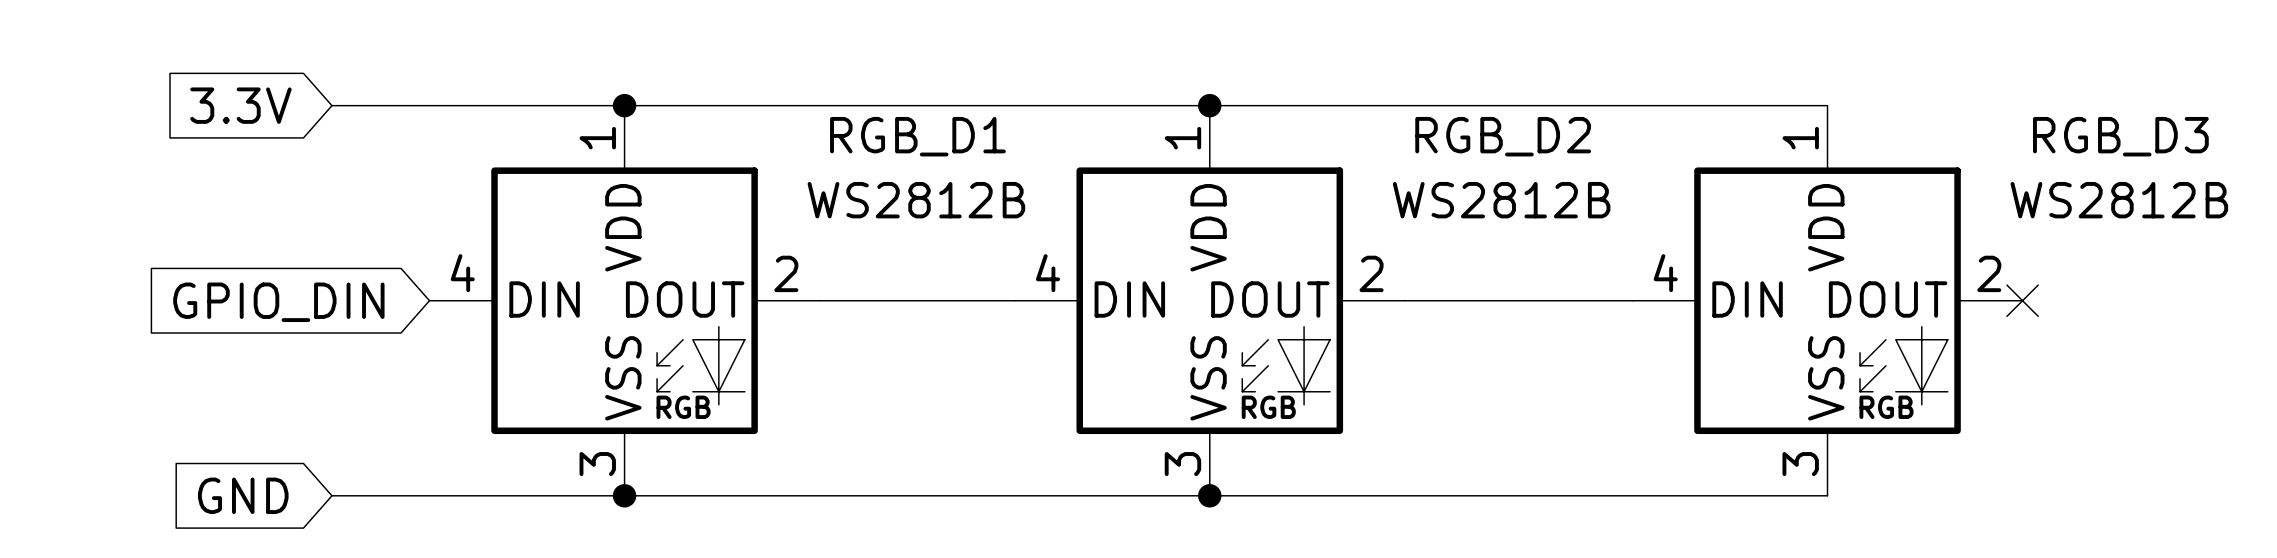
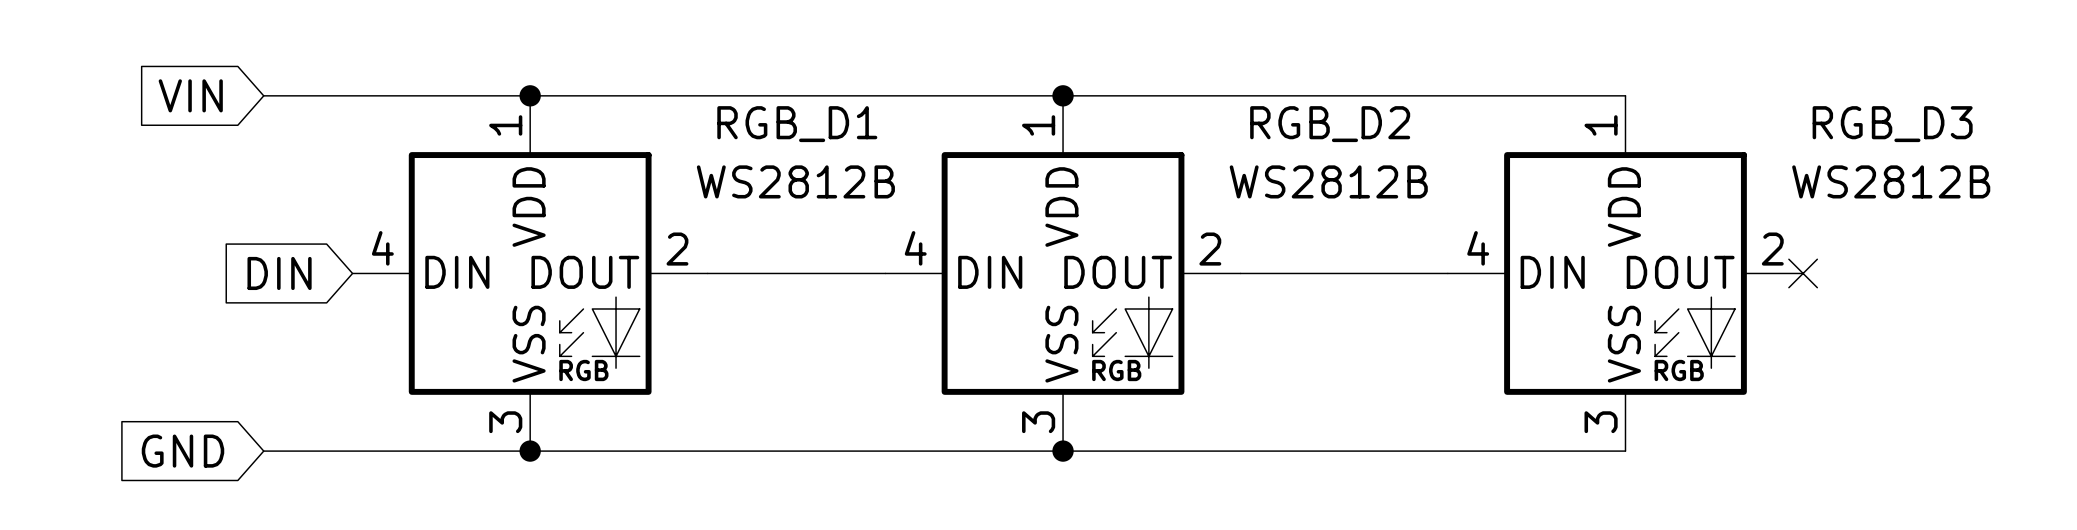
global label: 3.3V (240, 105) -> VIN (190, 95)
global label: GPIO_DIN (278, 302) -> DIN (279, 273)

